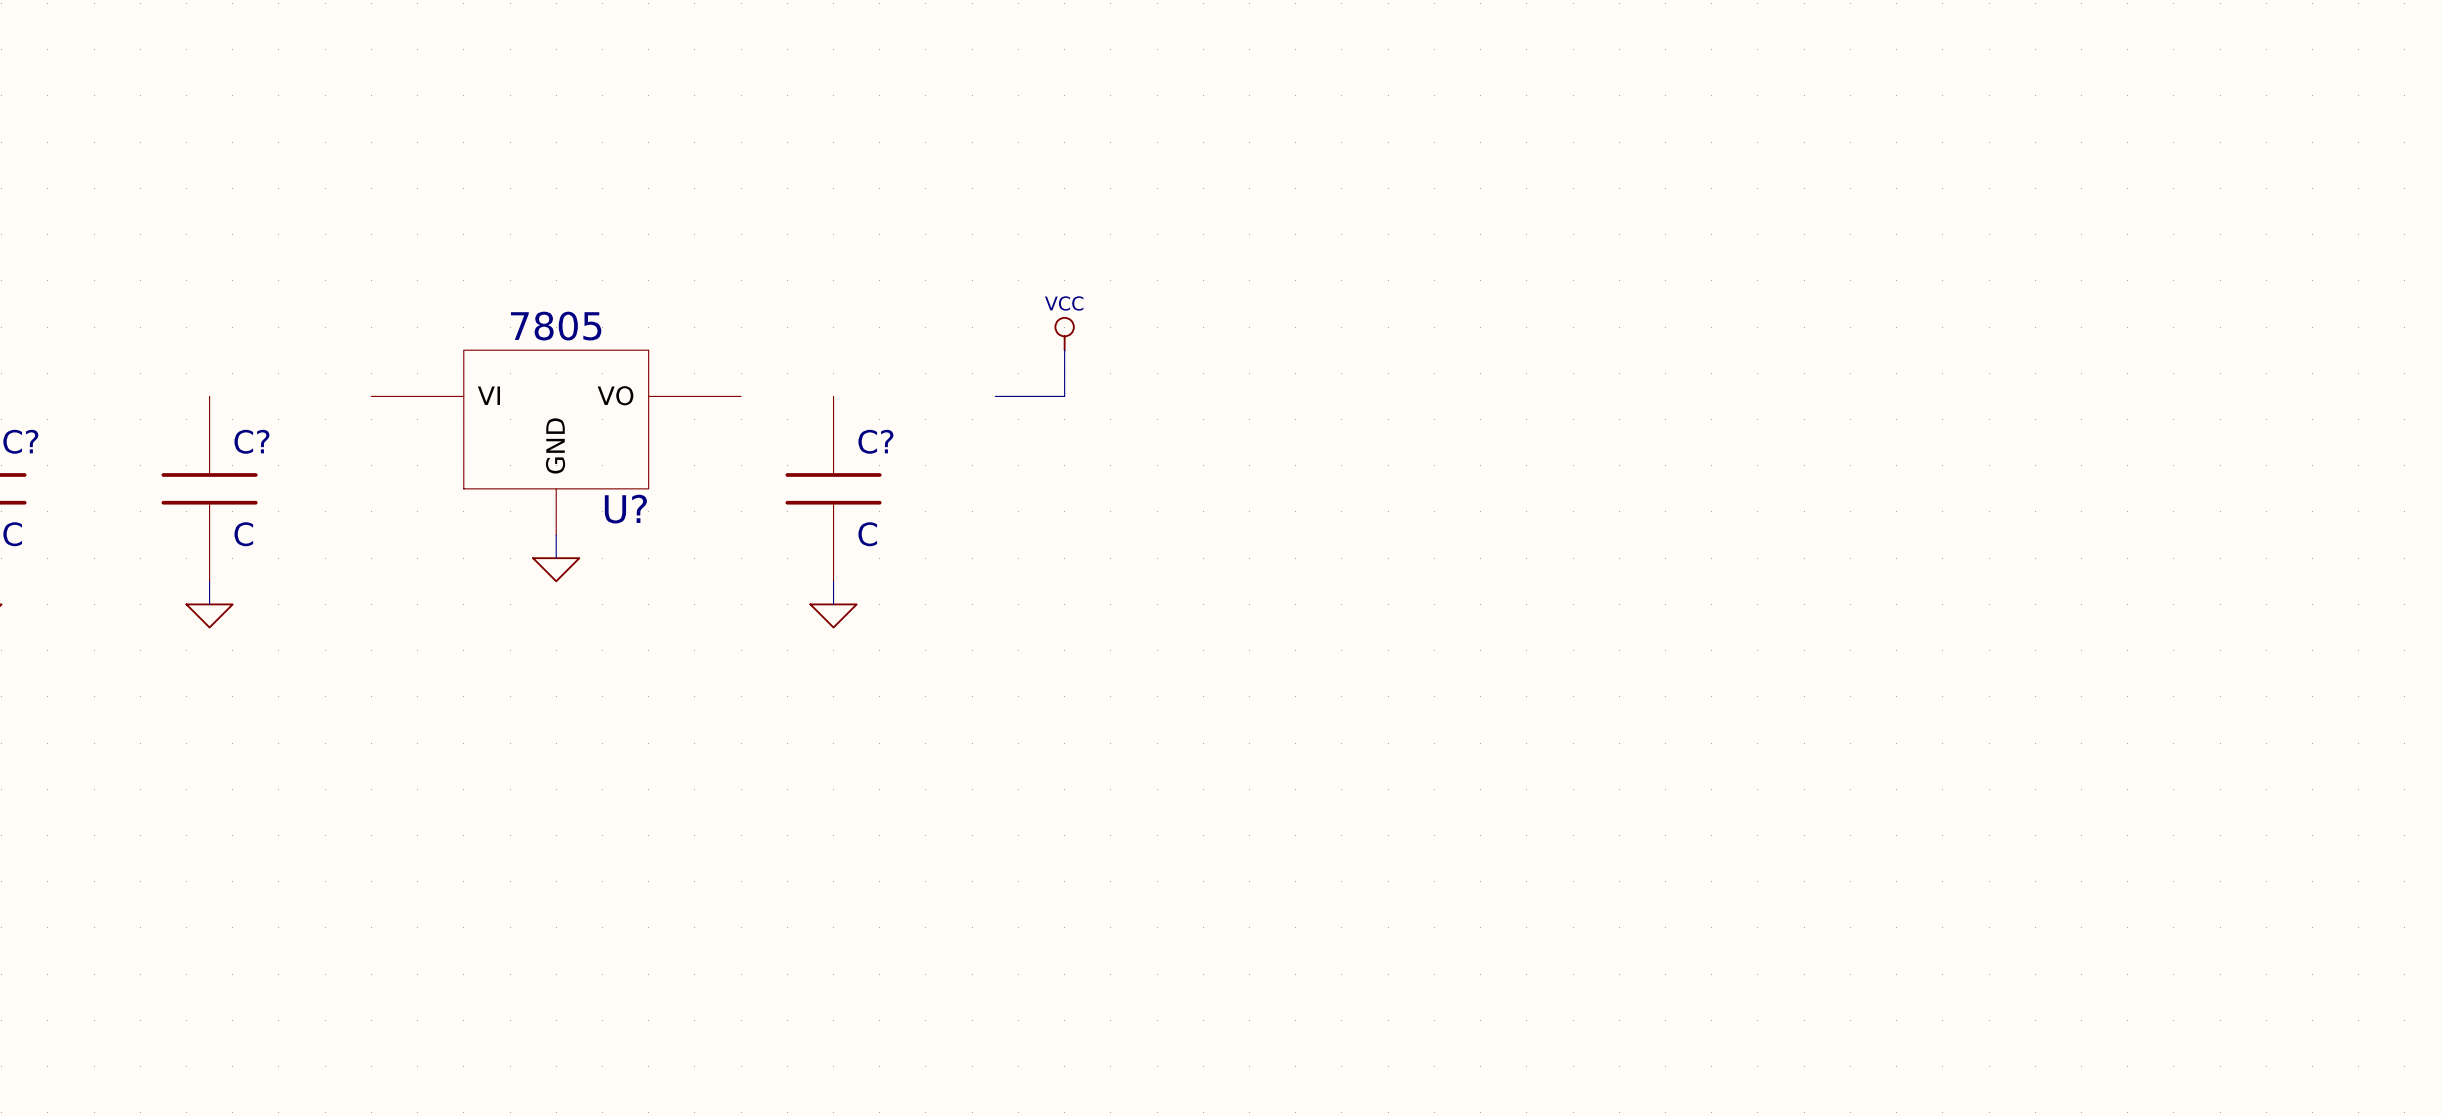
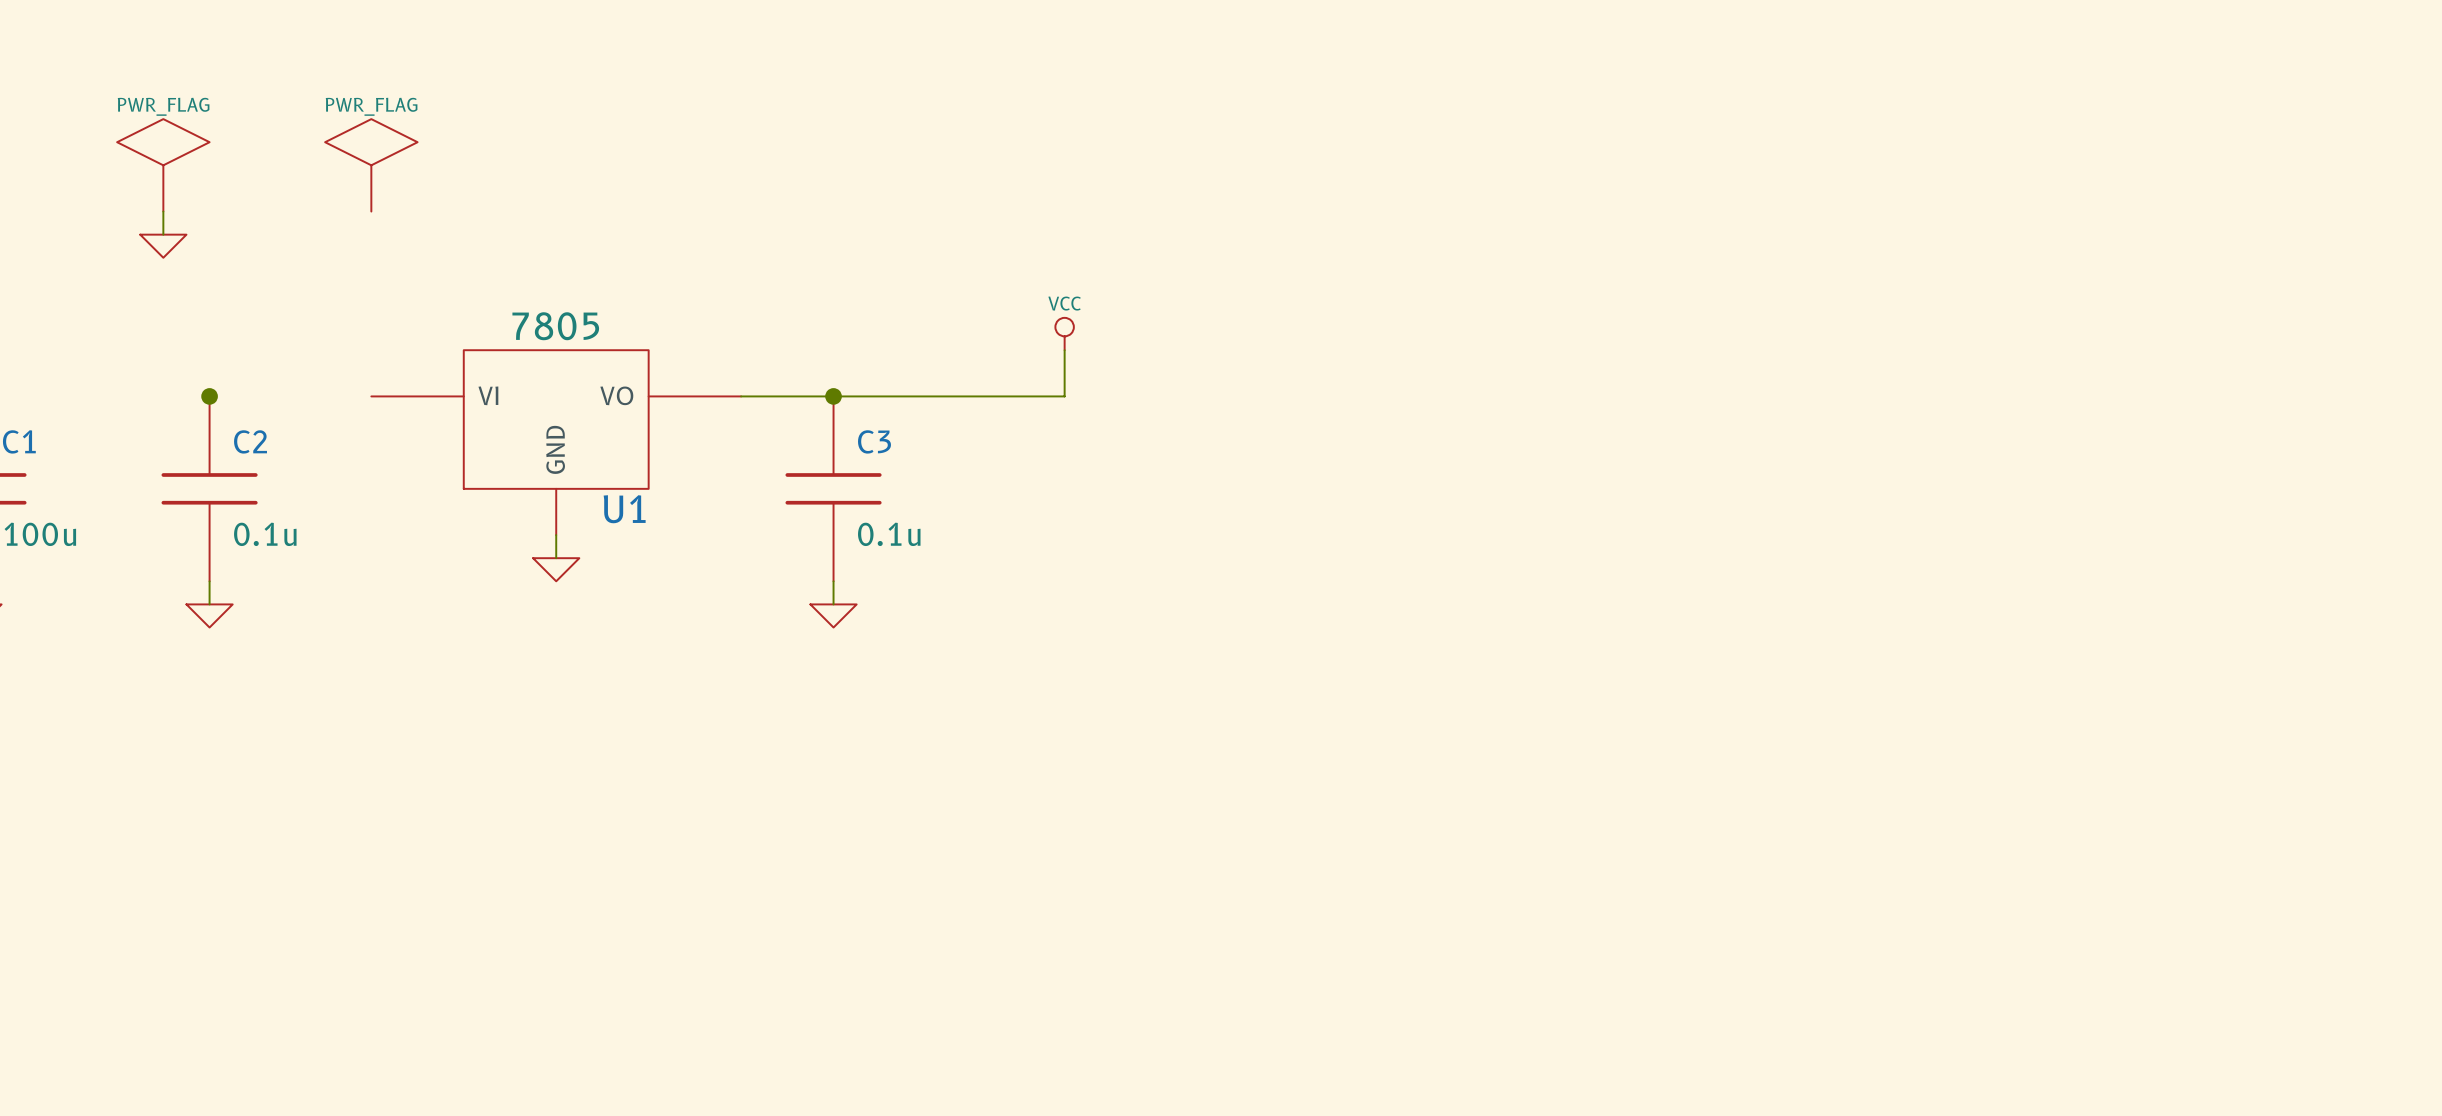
power symbol: none -> PWR_FLAG (163, 165)
power symbol: none -> PWR_FLAG (371, 165)
wire: none -> (163, 211) (163, 234)
power symbol: none -> (163, 246)
junction: none -> (209, 396)
wire: none -> (741, 396) (995, 396)
junction: none -> (833, 396)
C? name: C? (20, 441) -> C1 (19, 441)
C? name: C? (251, 441) -> C2 (250, 441)
C? name: C? (875, 441) -> C3 (874, 441)
U? name: U? (625, 509) -> U1 (624, 509)
C? value: C (12, 534) -> 100u (40, 534)
C? value: C (243, 534) -> 0.1u (265, 534)
C? value: C (867, 534) -> 0.1u (889, 534)

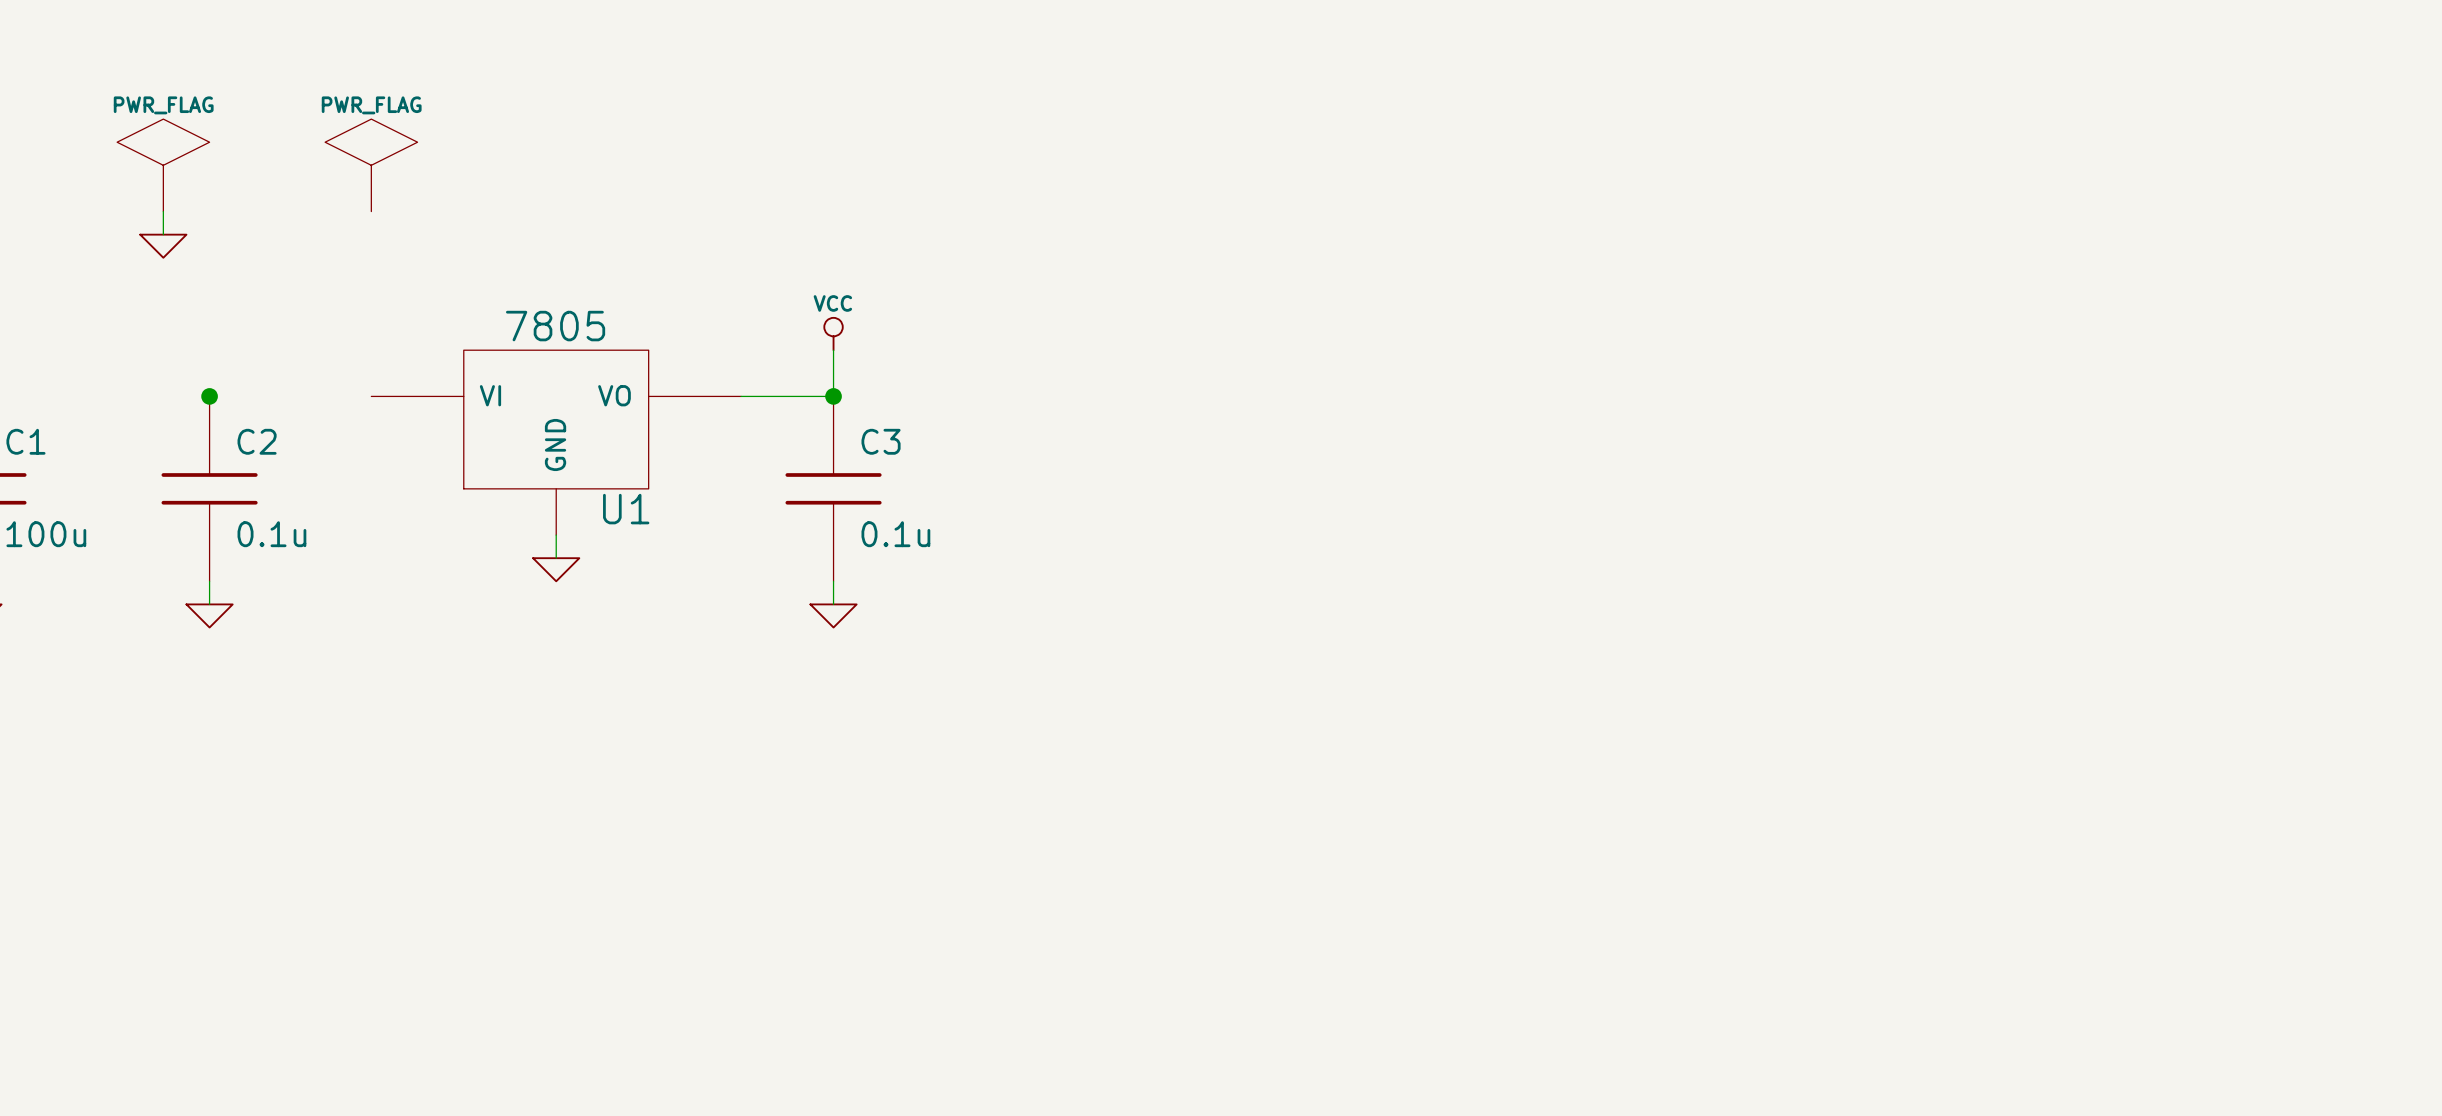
power symbol position: VCC (1064, 334) -> VCC (833, 334)
wire: (1064, 350) (1064, 396) (833, 396) -> (833, 350) (833, 396)

